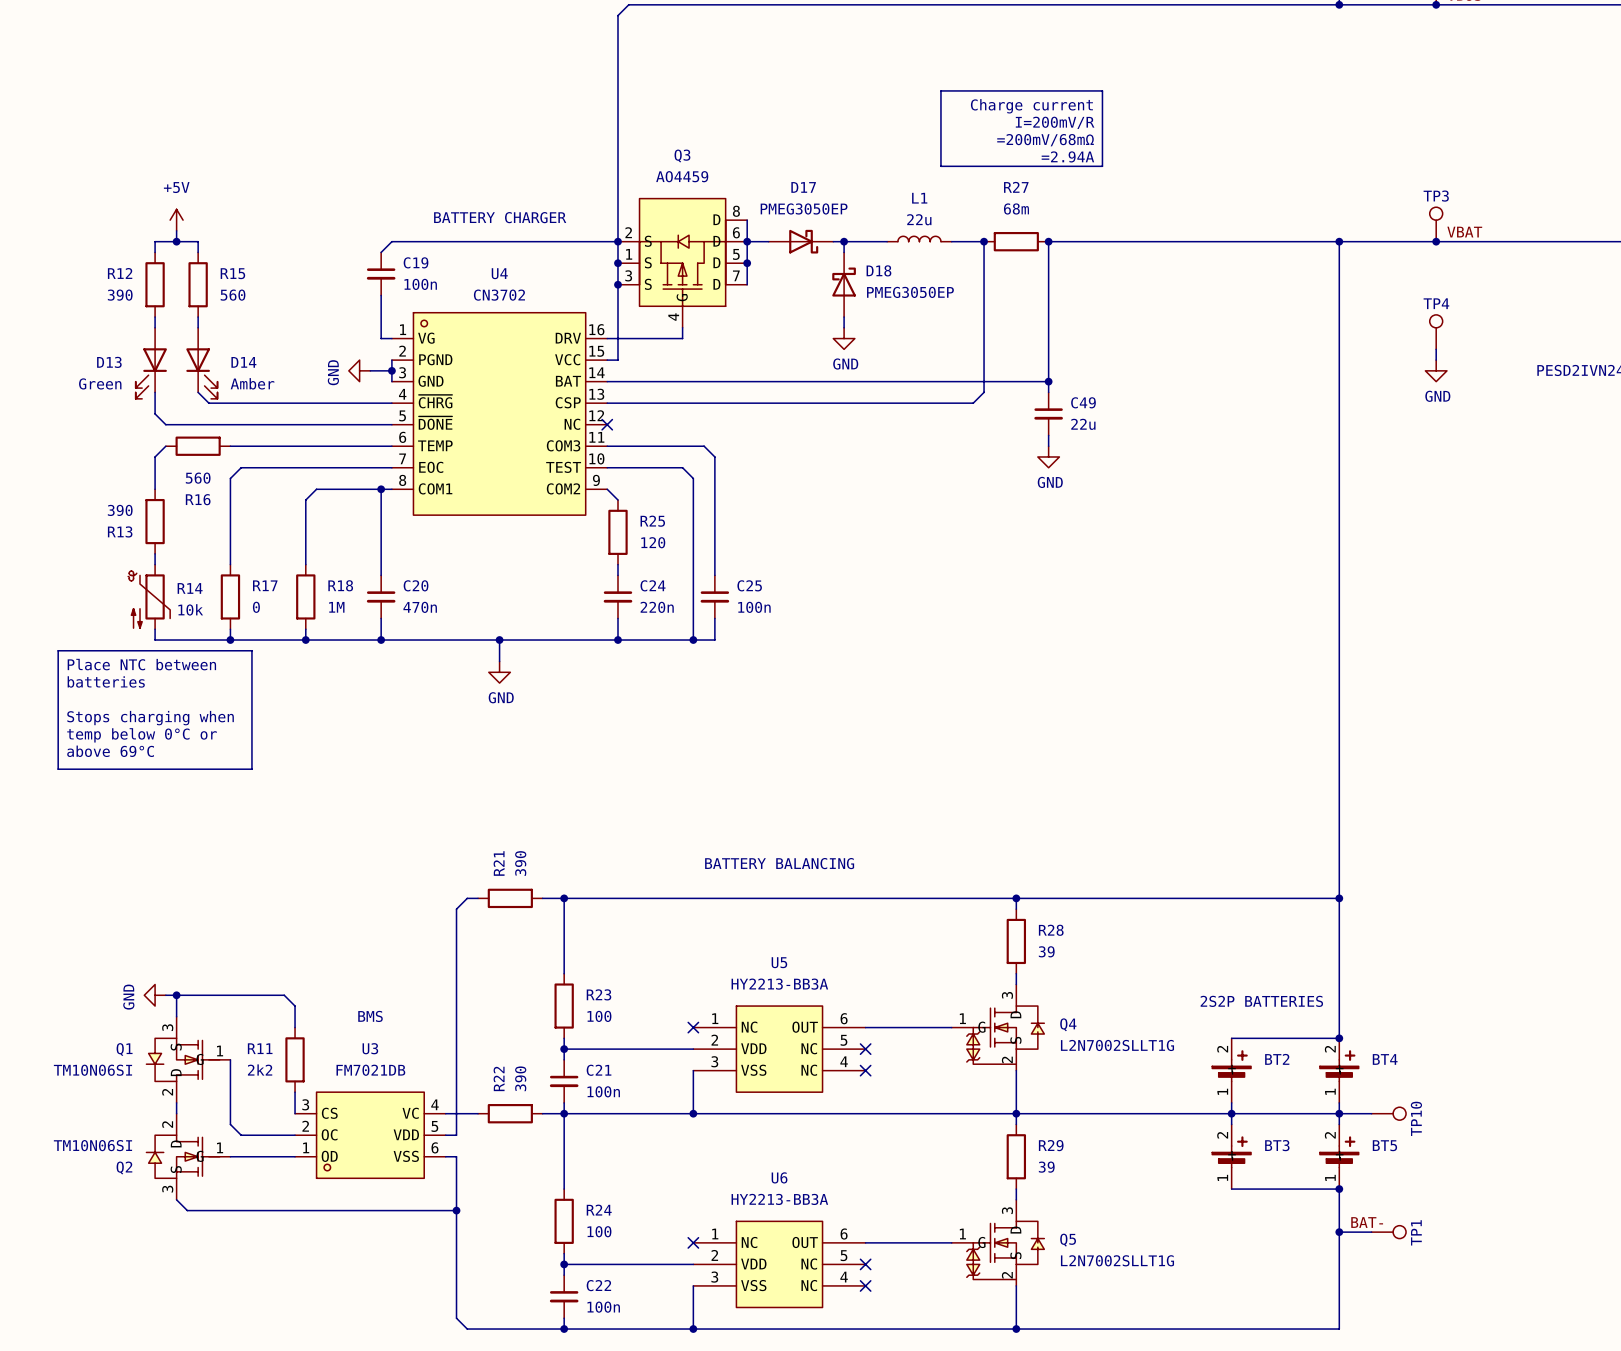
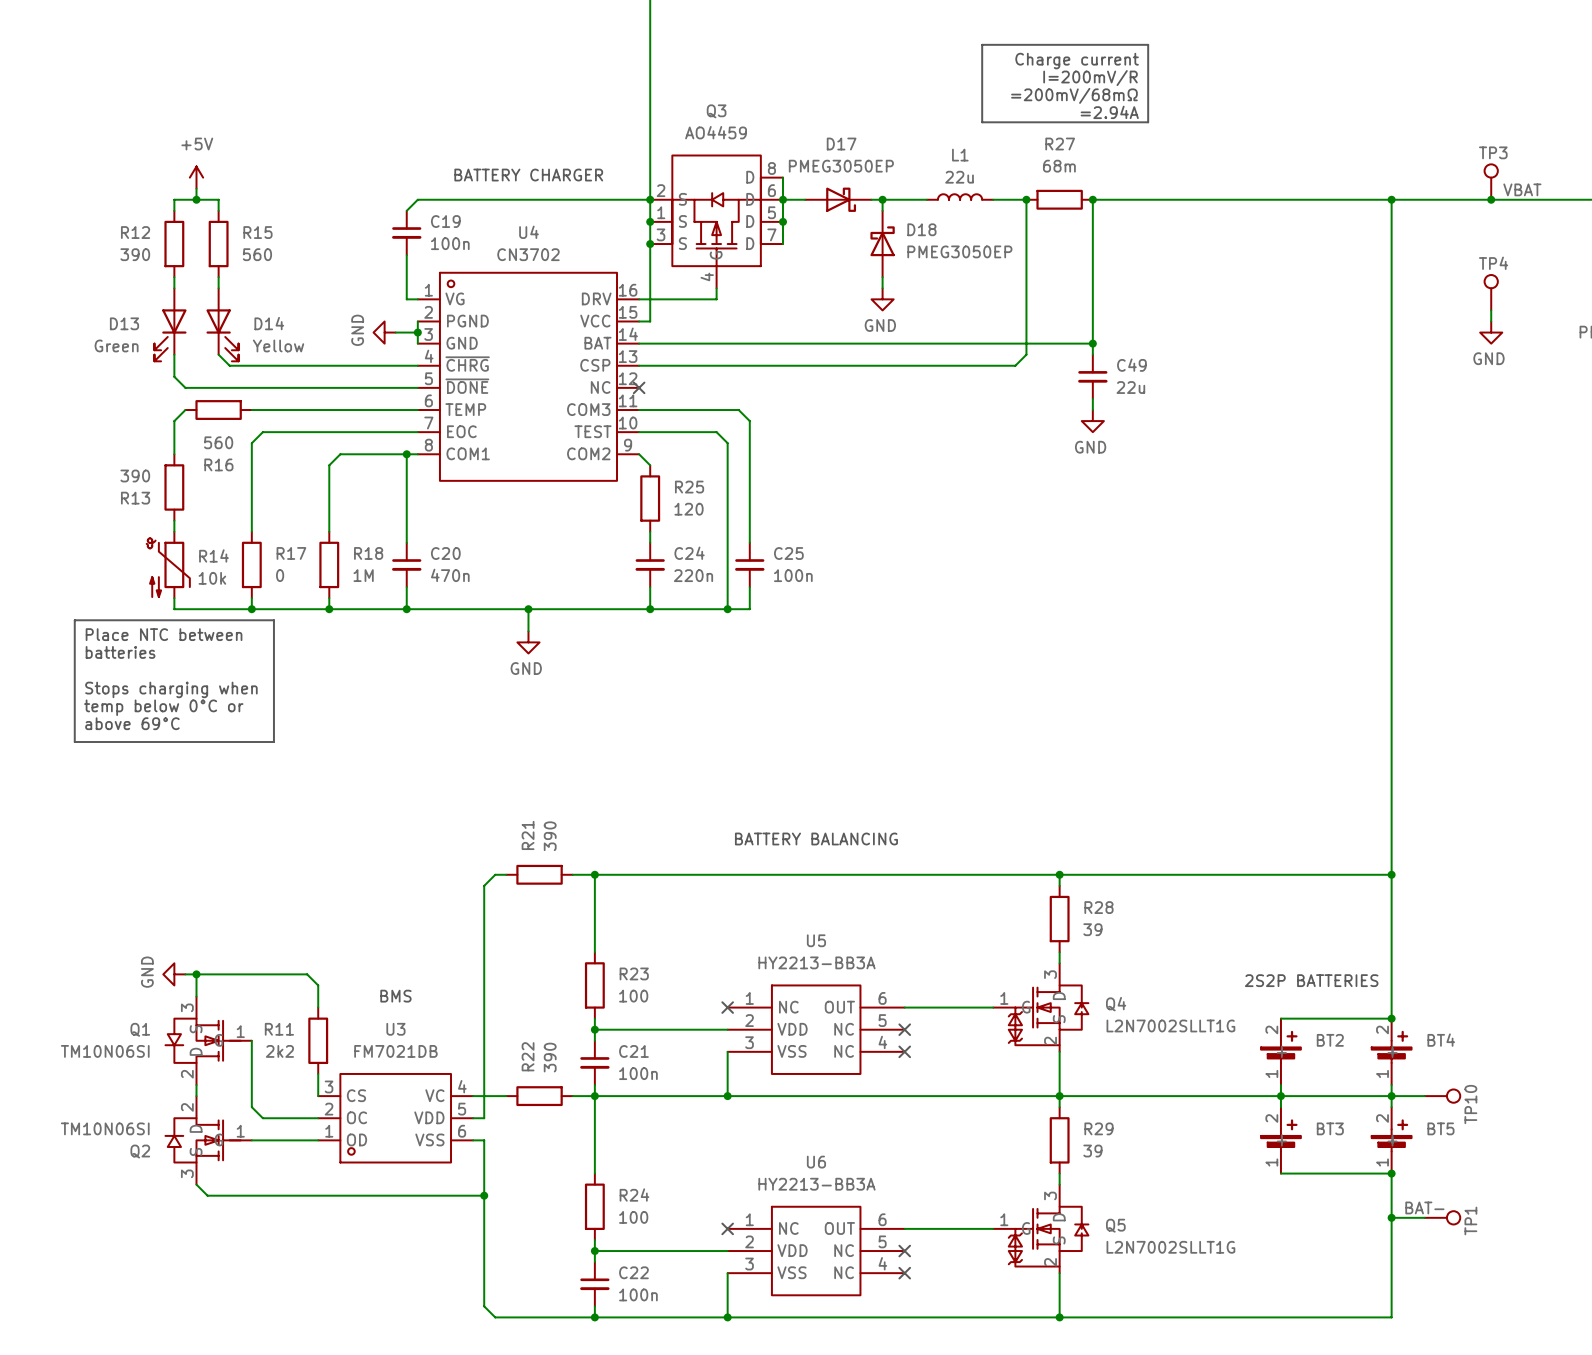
D14 value: Amber (252, 383) -> Yellow (278, 345)

